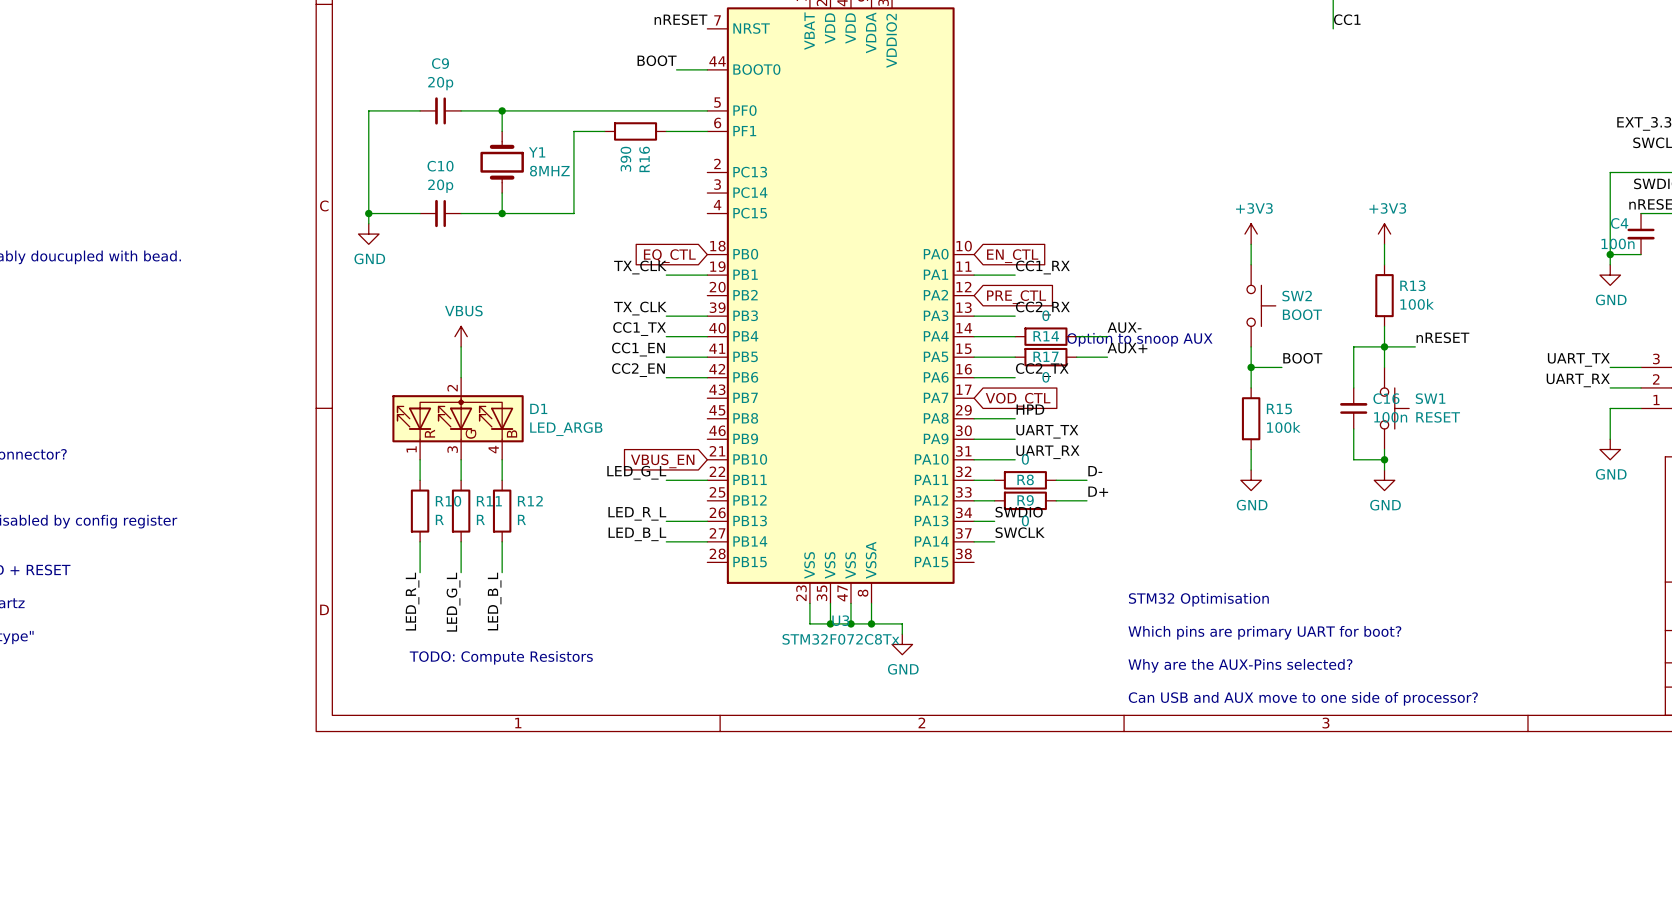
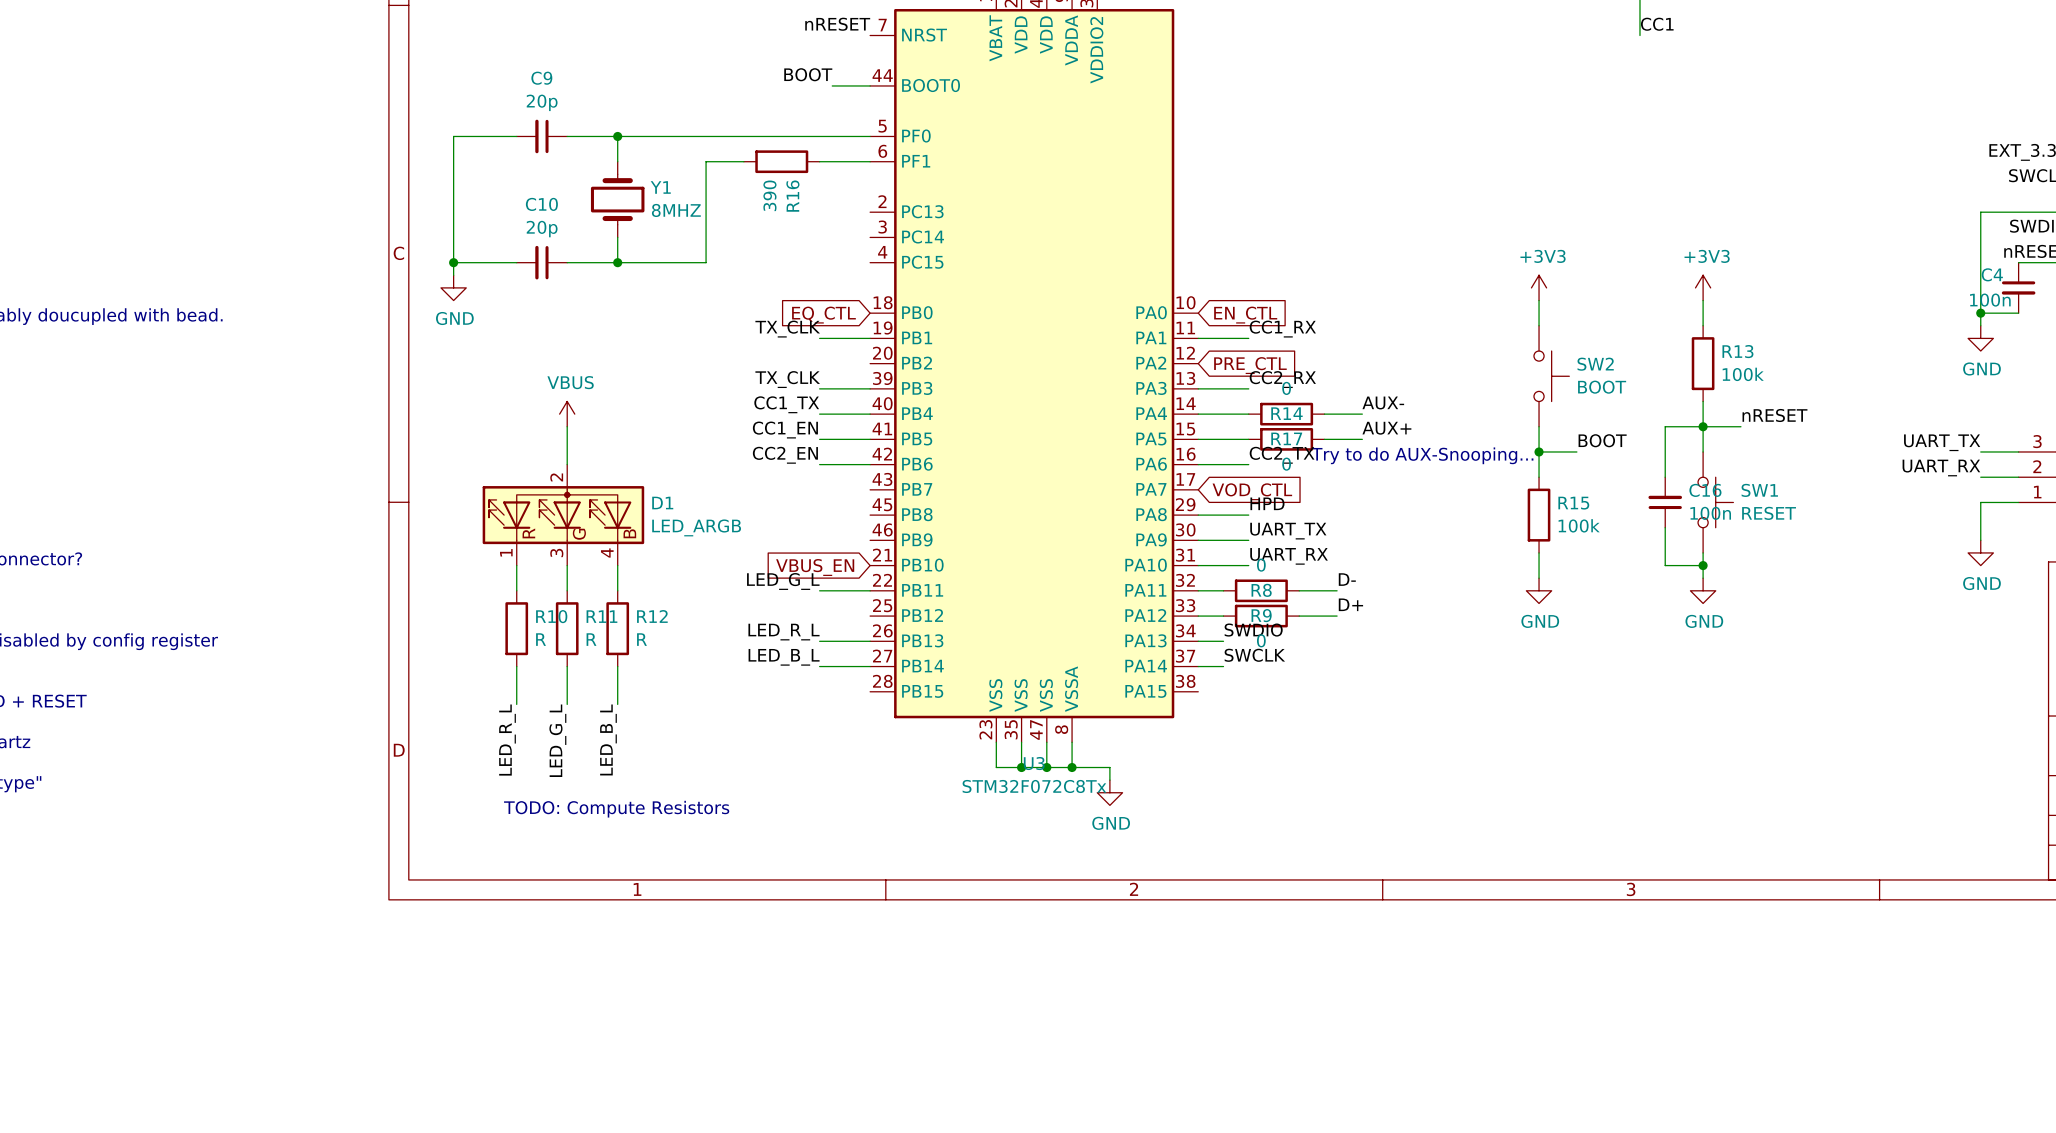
text: Option to snoop AUX (1139, 339) -> none
text: none -> Try to do AUX-Snooping... (1422, 455)
text: STM32 Optimisation (1198, 599) -> none
text: Which pins are primary UART for boot? (1264, 632) -> none
text: Why are the AUX-Pins selected? (1240, 665) -> none
text: Can USB and AUX move to one side of processor? (1303, 698) -> none

